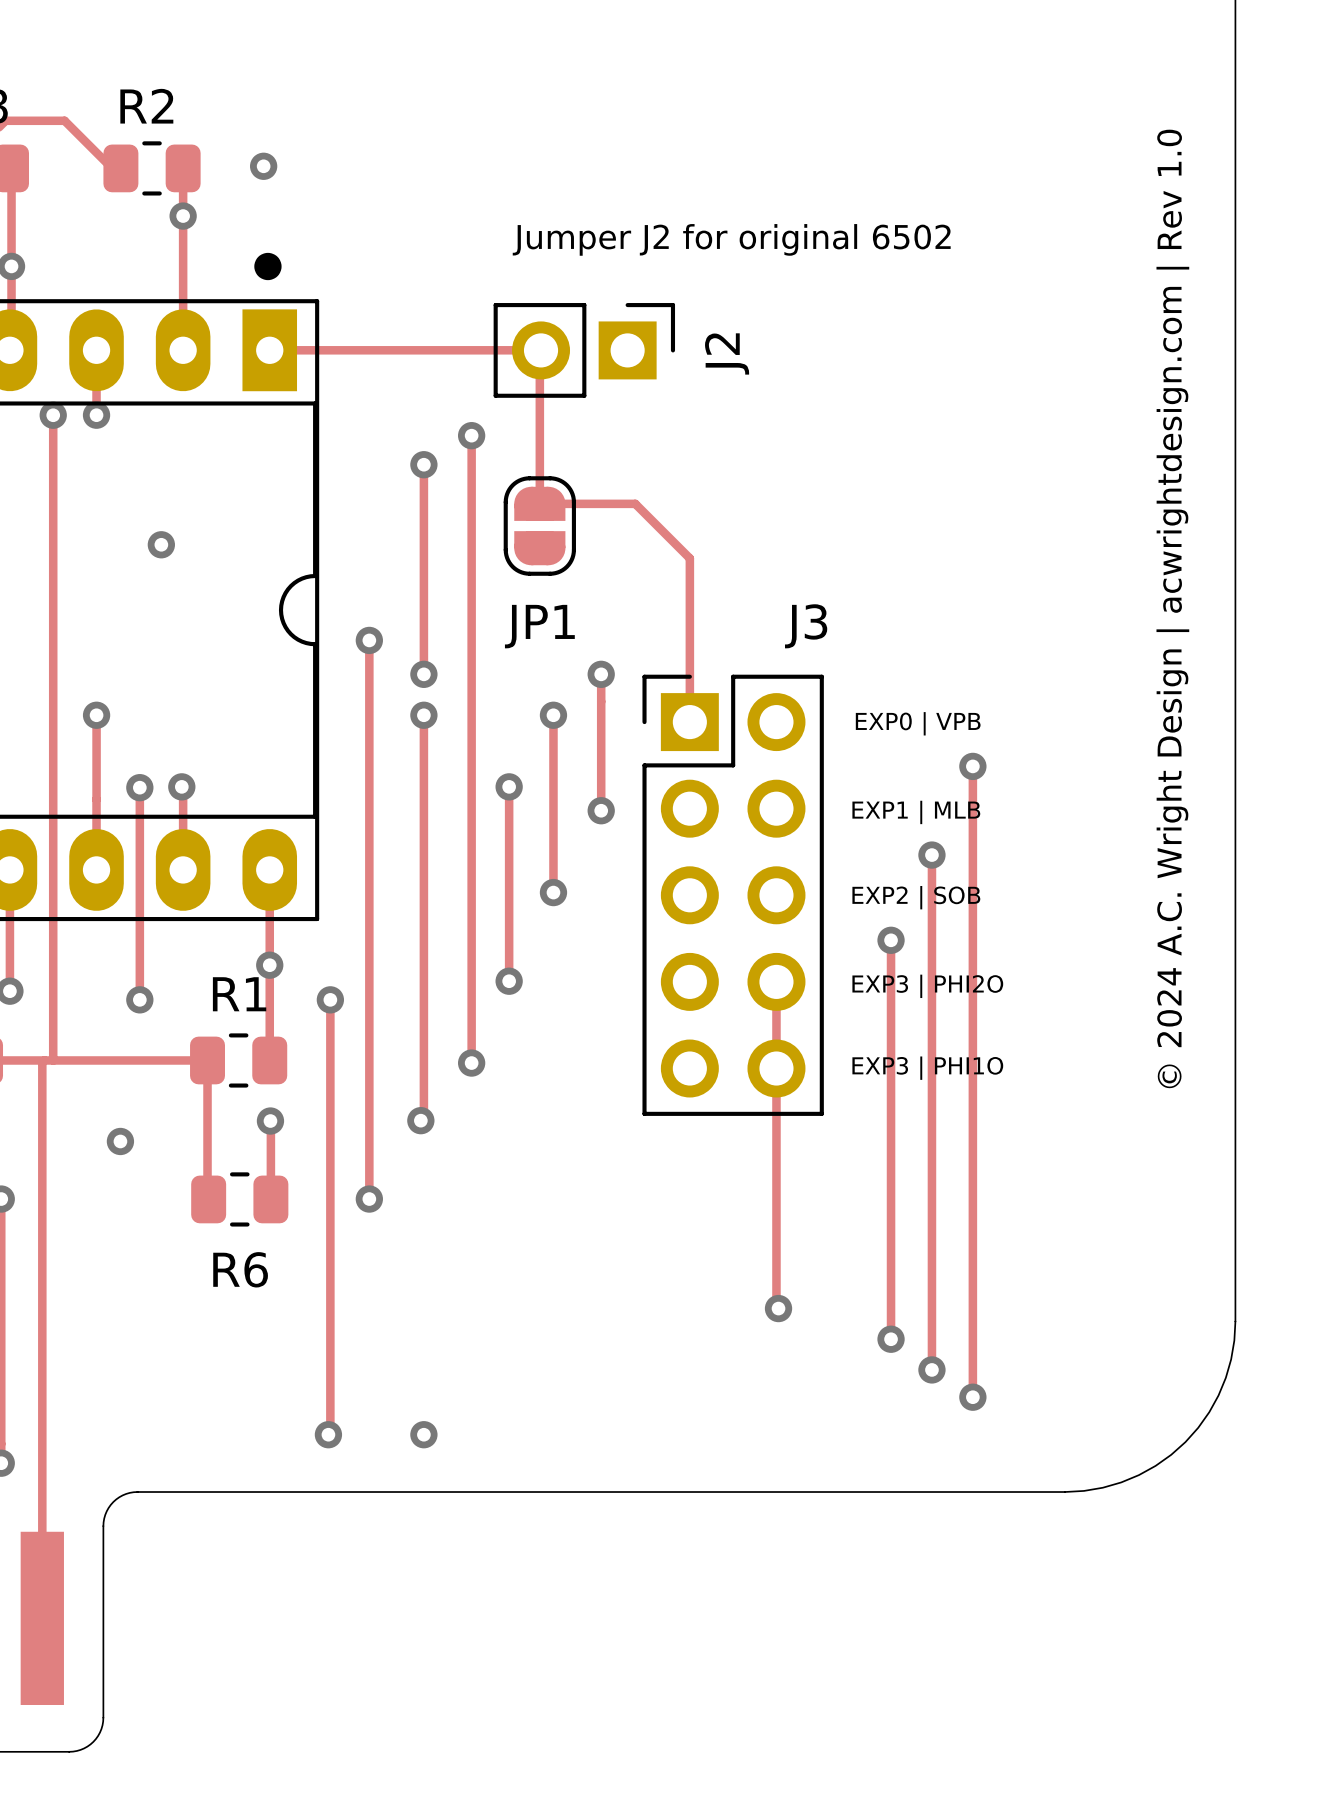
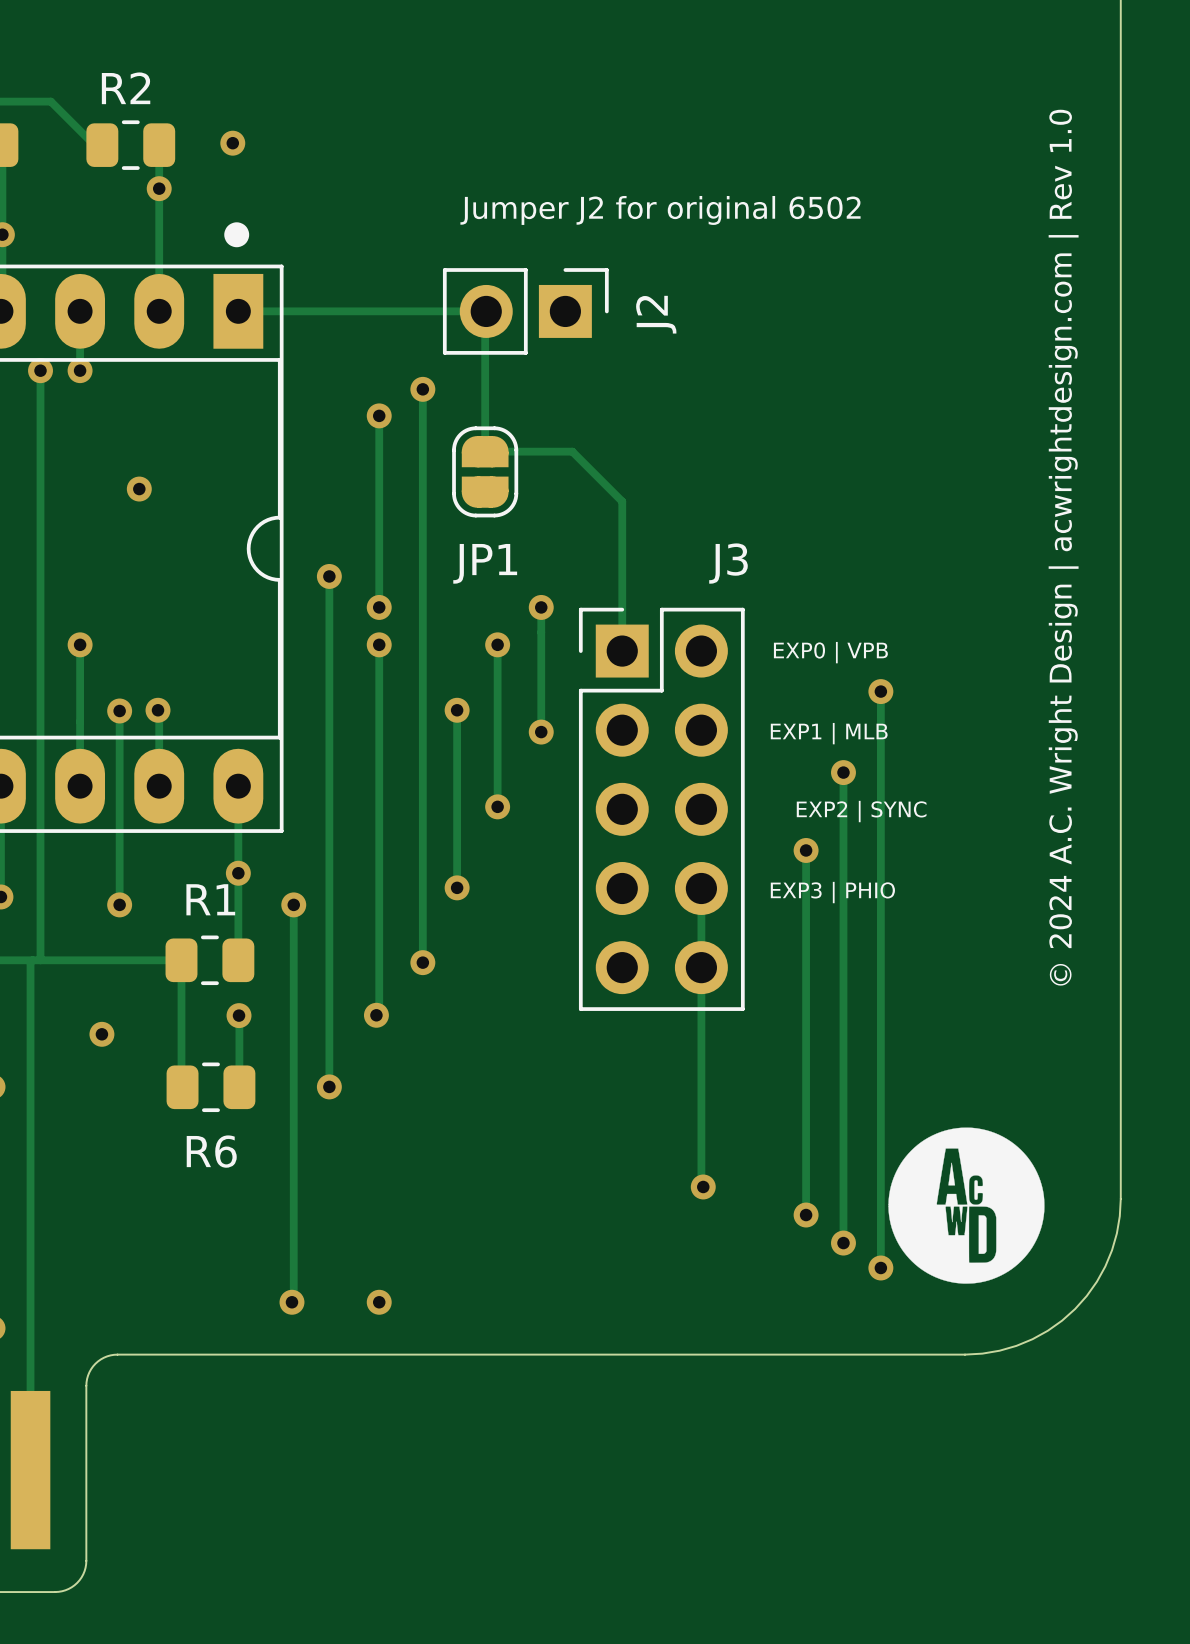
text: EXP2 | SOB (916, 897) -> EXP2 | SYNC (861, 811)
text: EXP3 | PHI2O (927, 986) -> EXP3 | PHIO (832, 892)
text: EXP3 | PHI1O (927, 1068) -> none
drawing: none -> [888, 1127, 1045, 1284]

